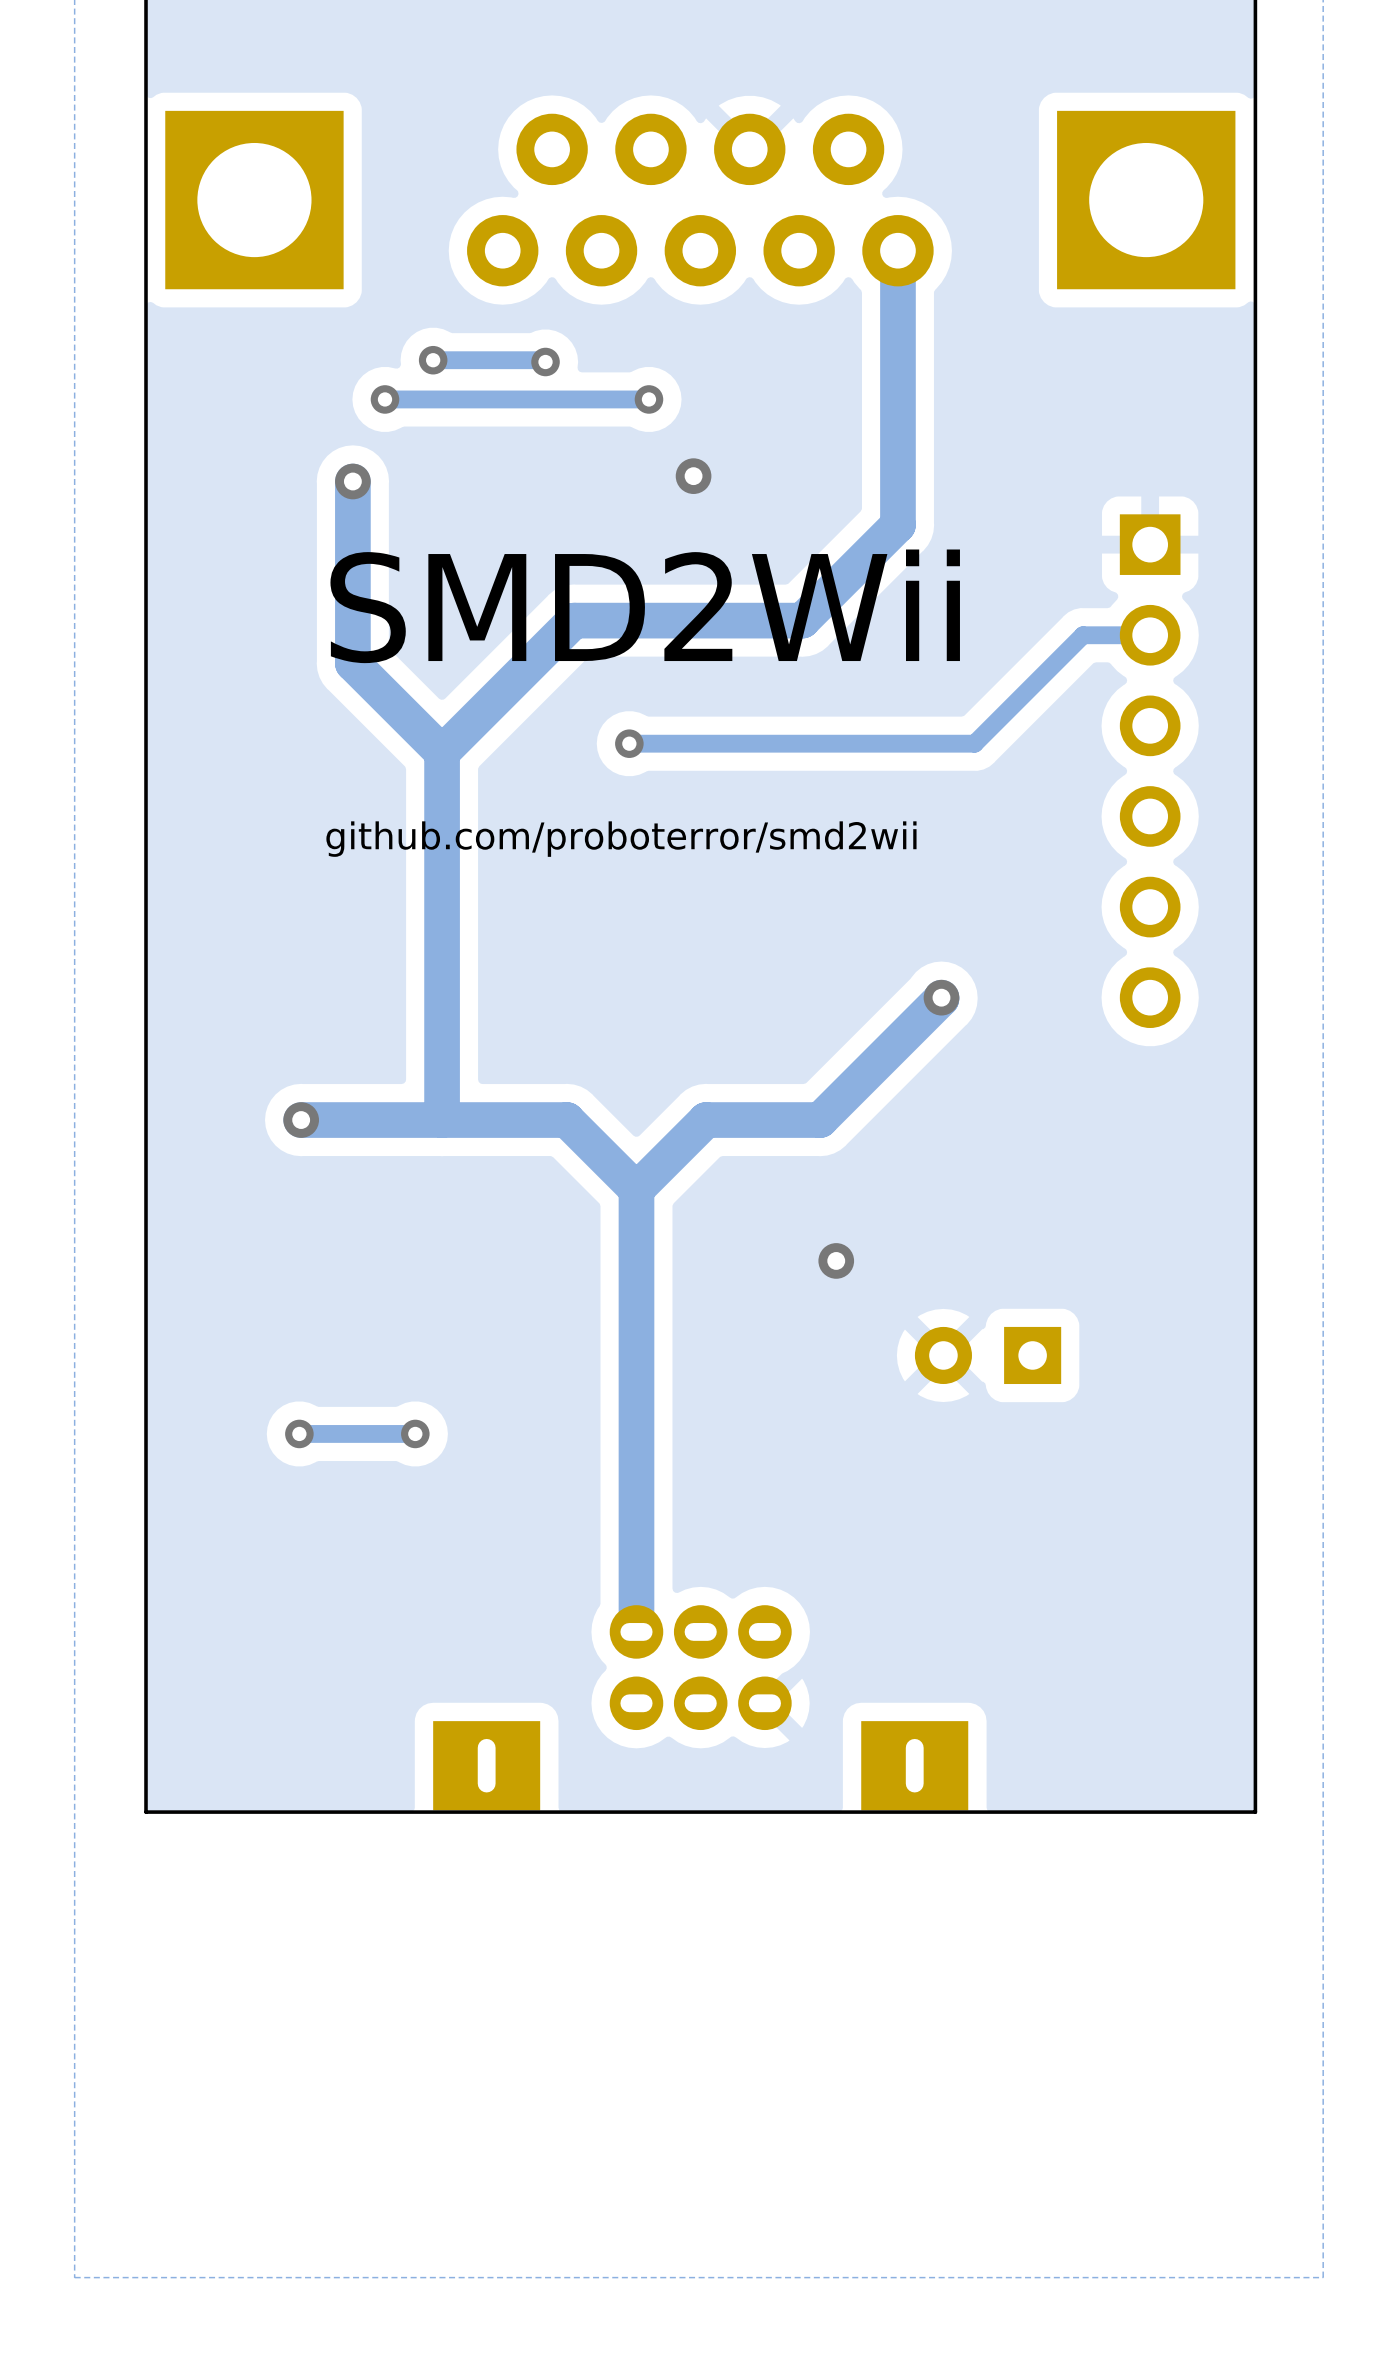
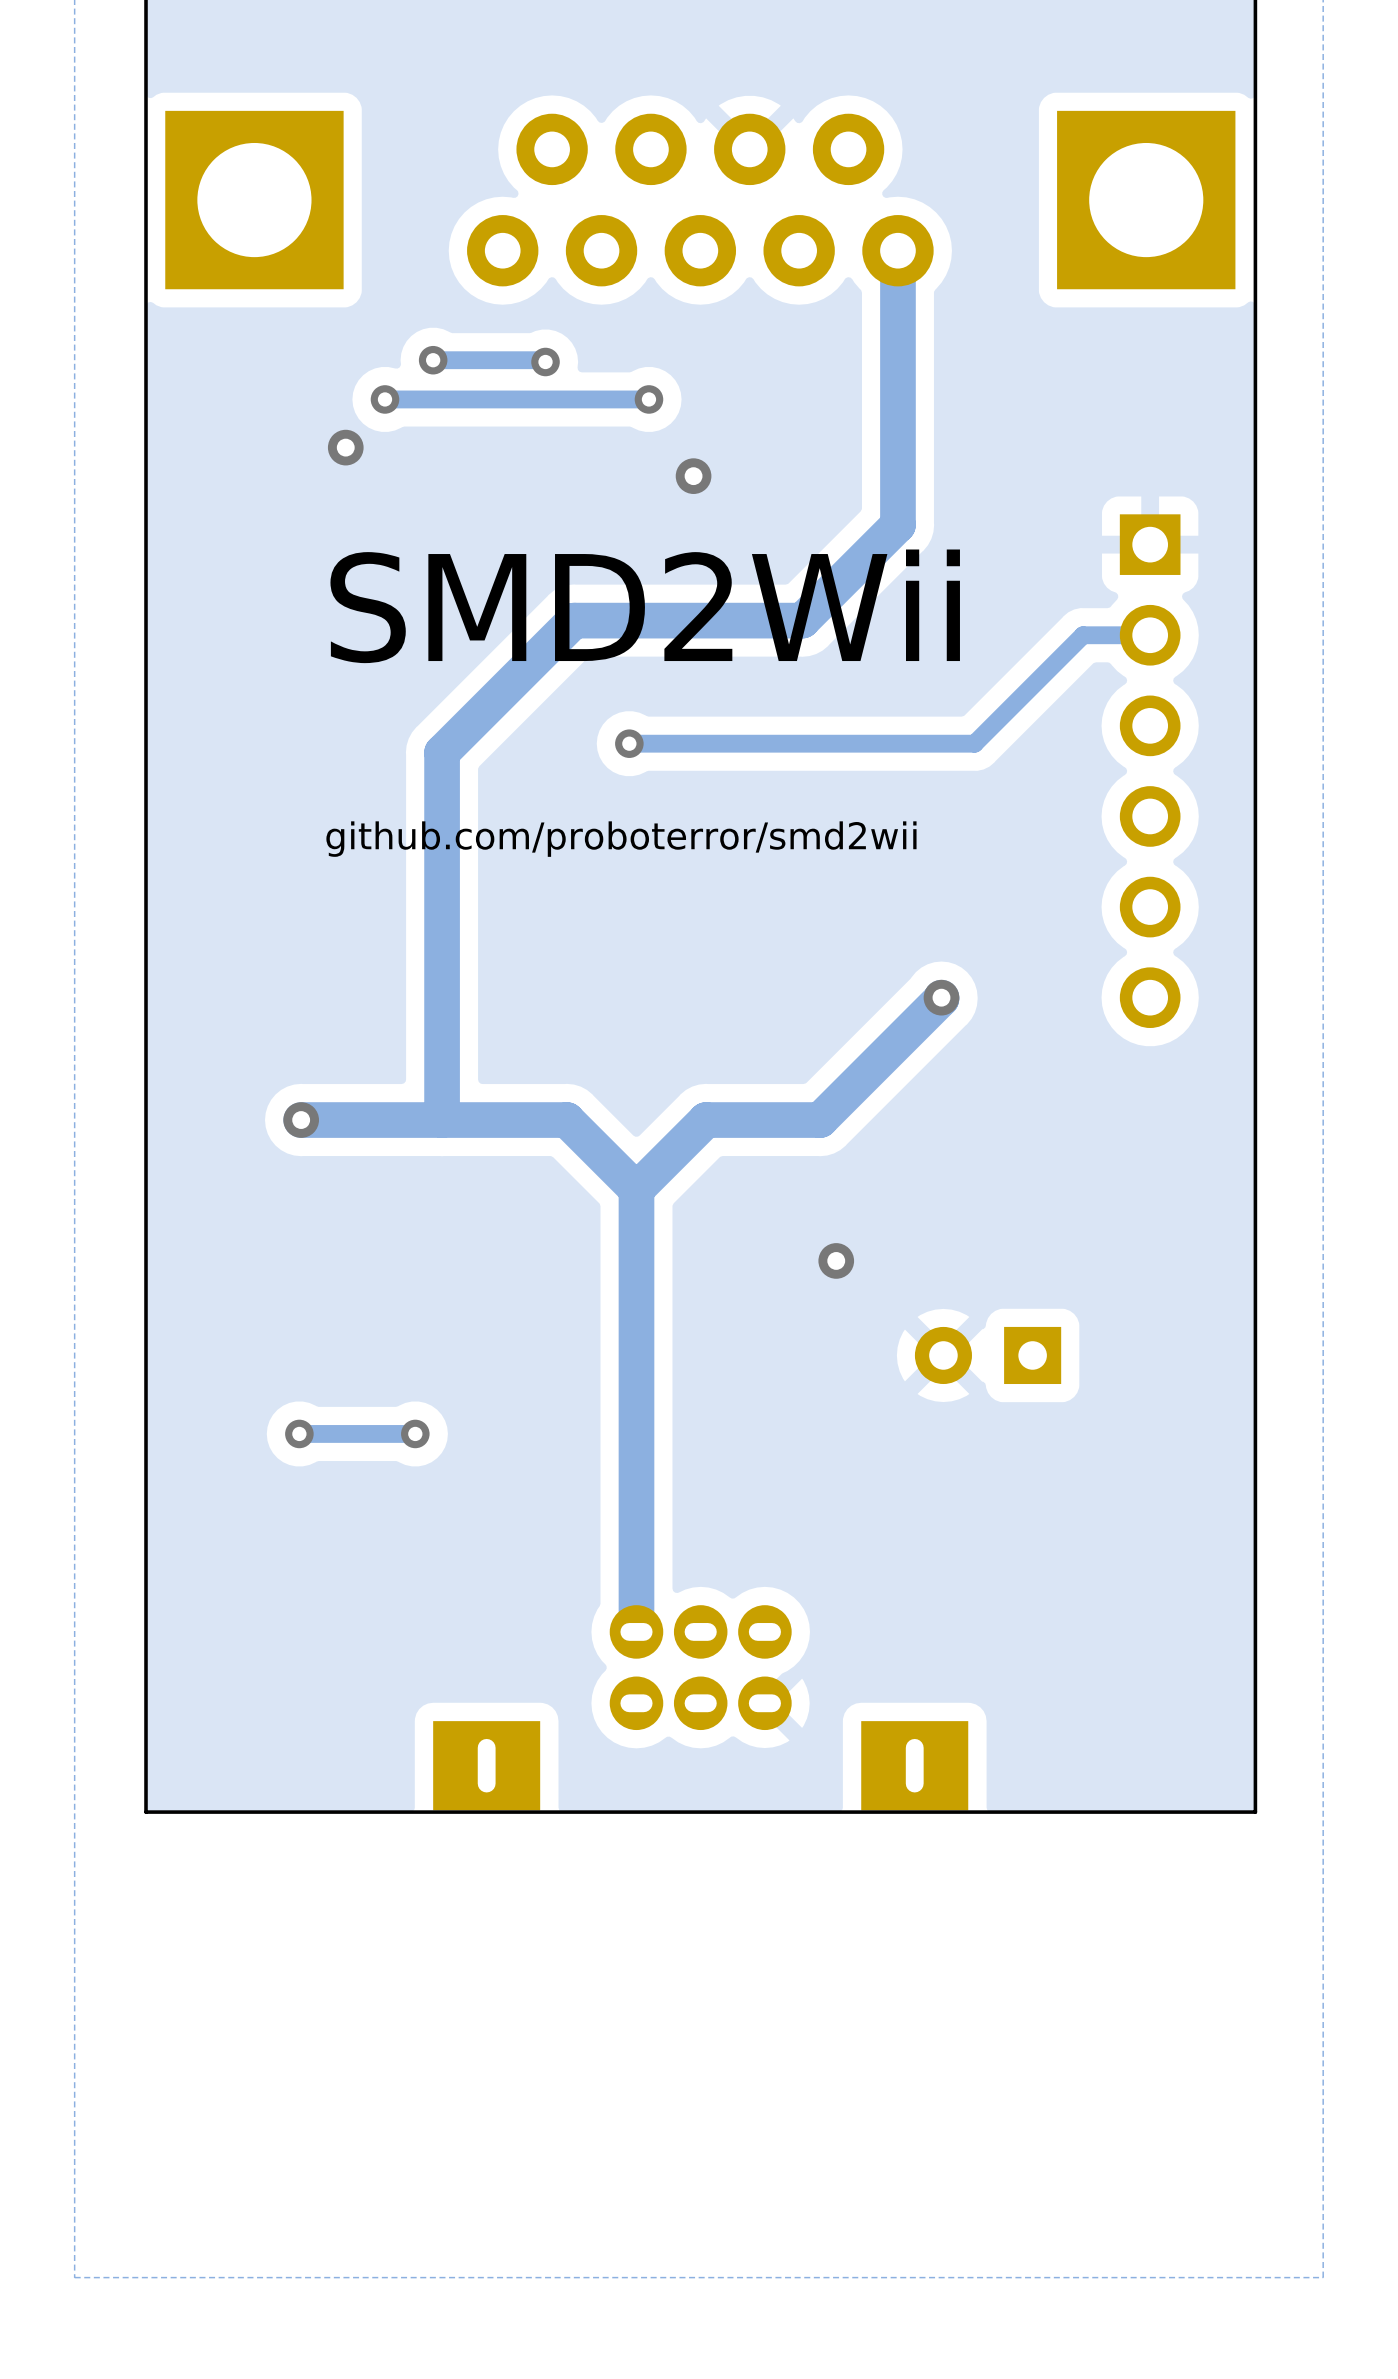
track: (352, 481) (352, 663) (442, 752) -> none
via position: (352, 481) -> (345, 447)

